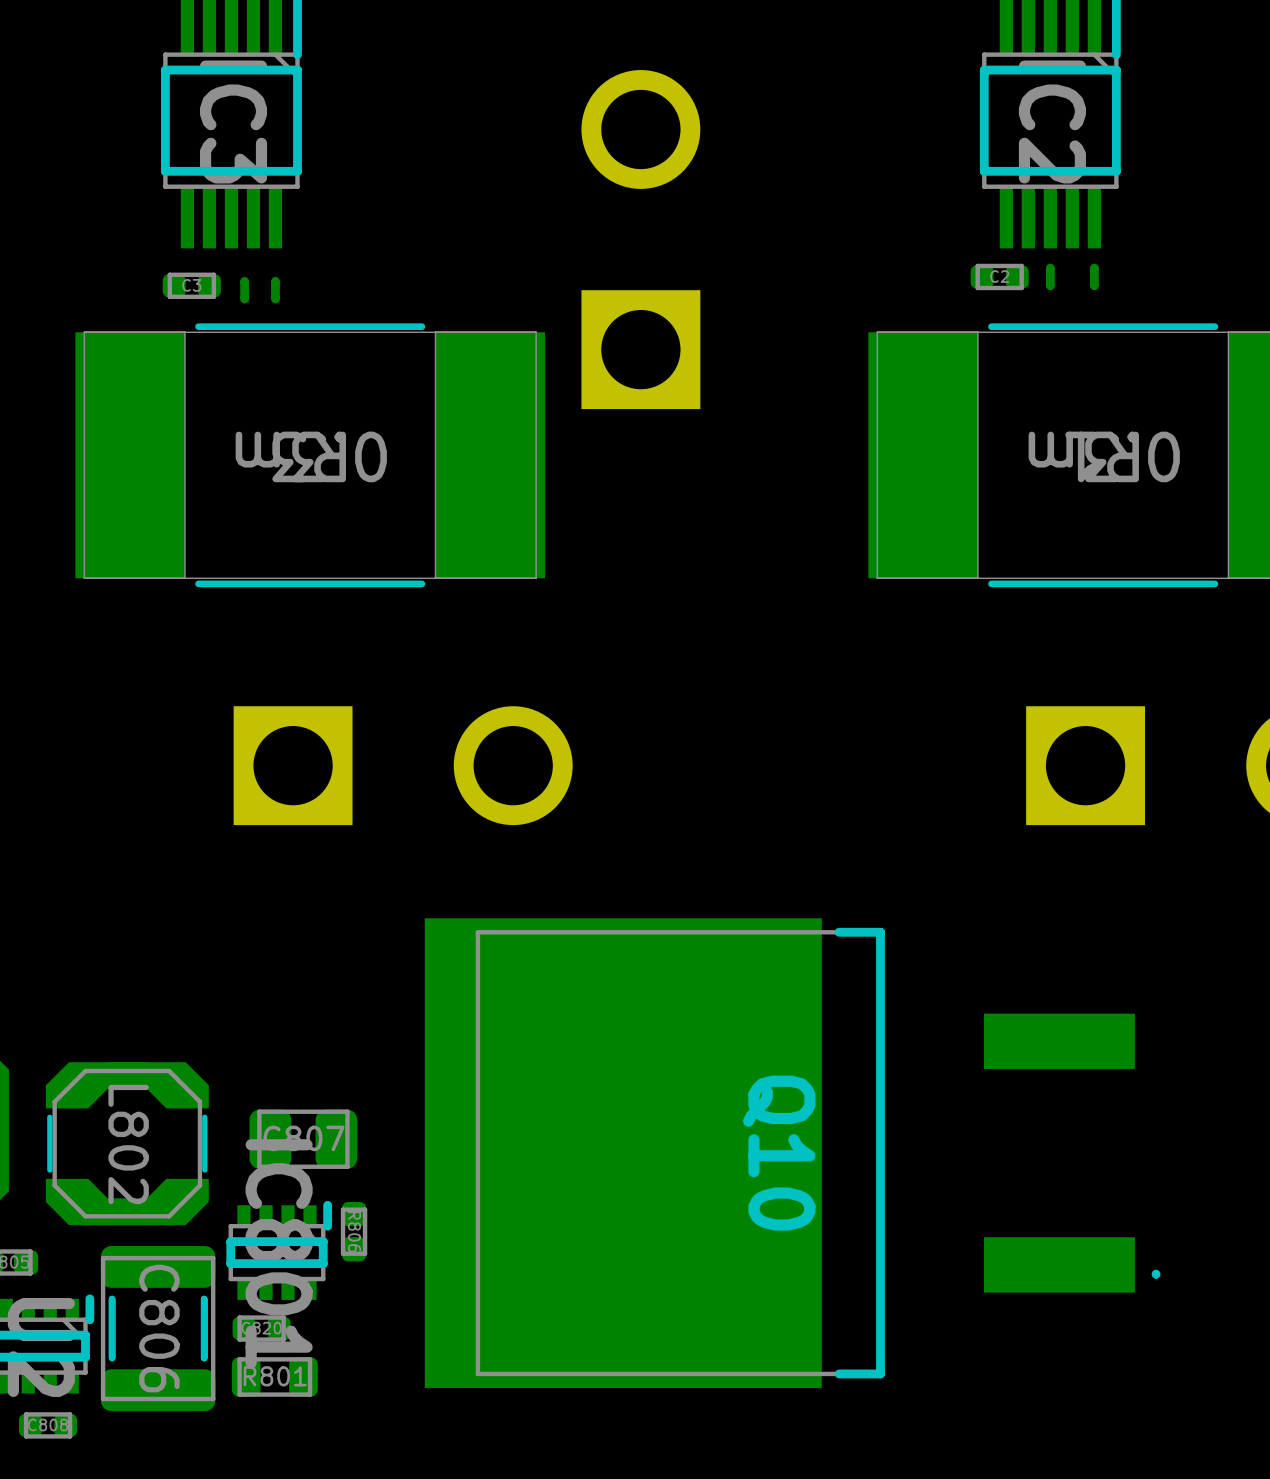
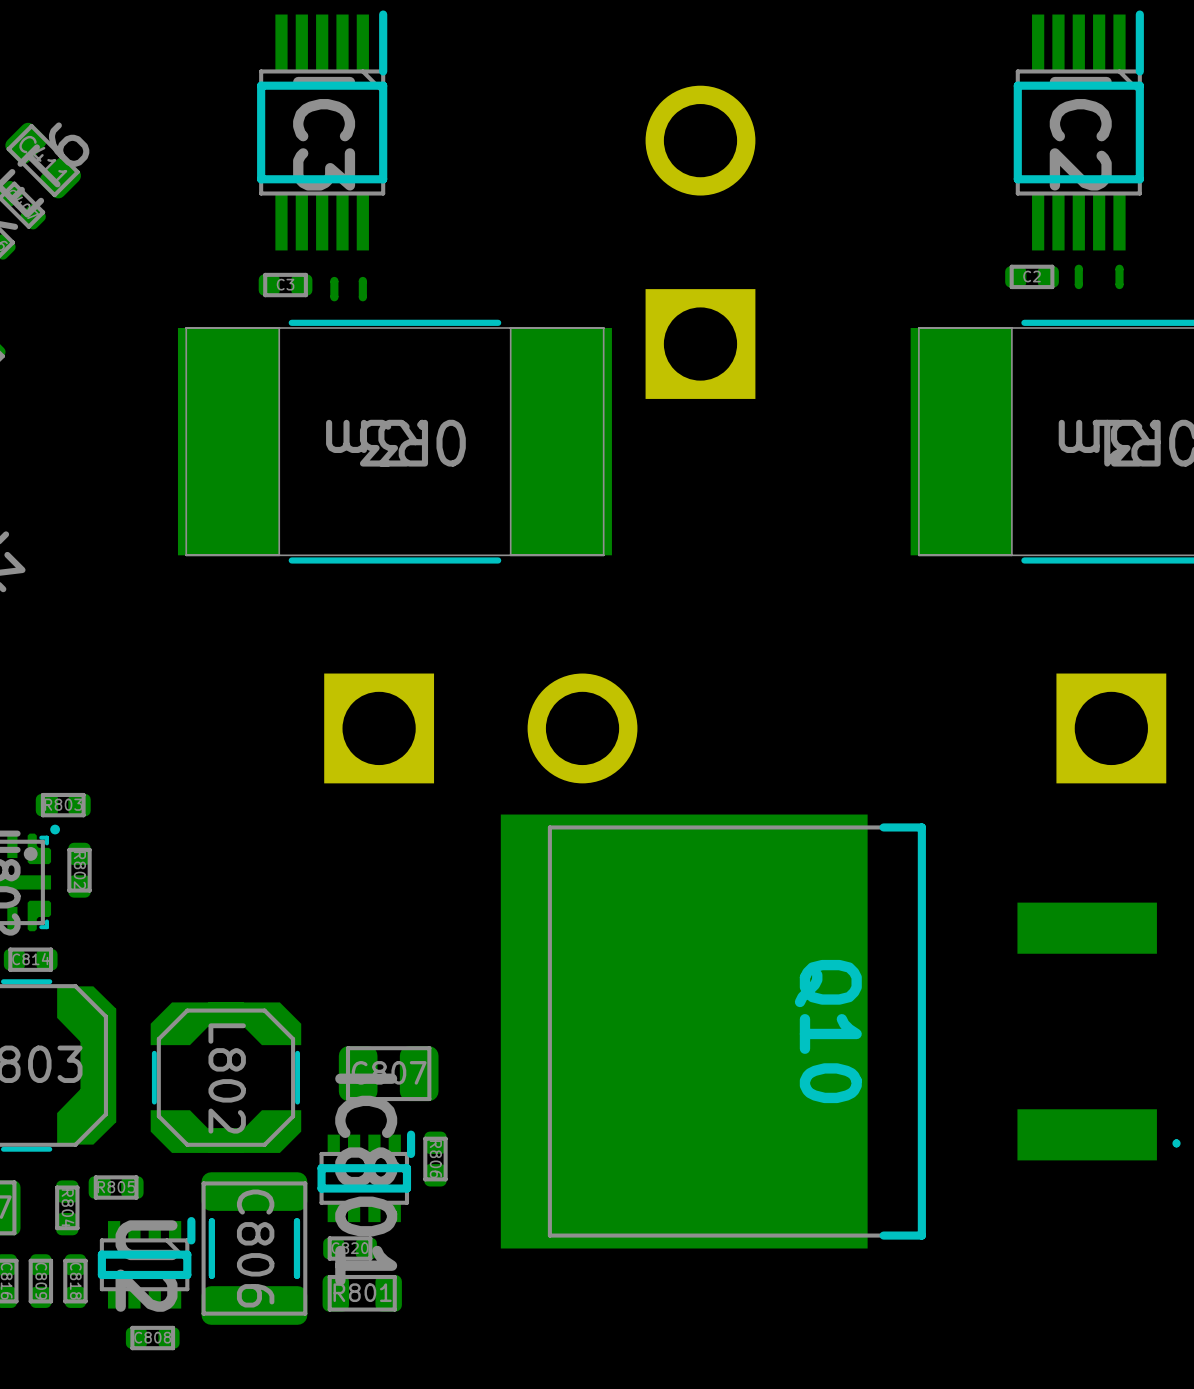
Q10 position: (792, 1153) -> (840, 1031)

